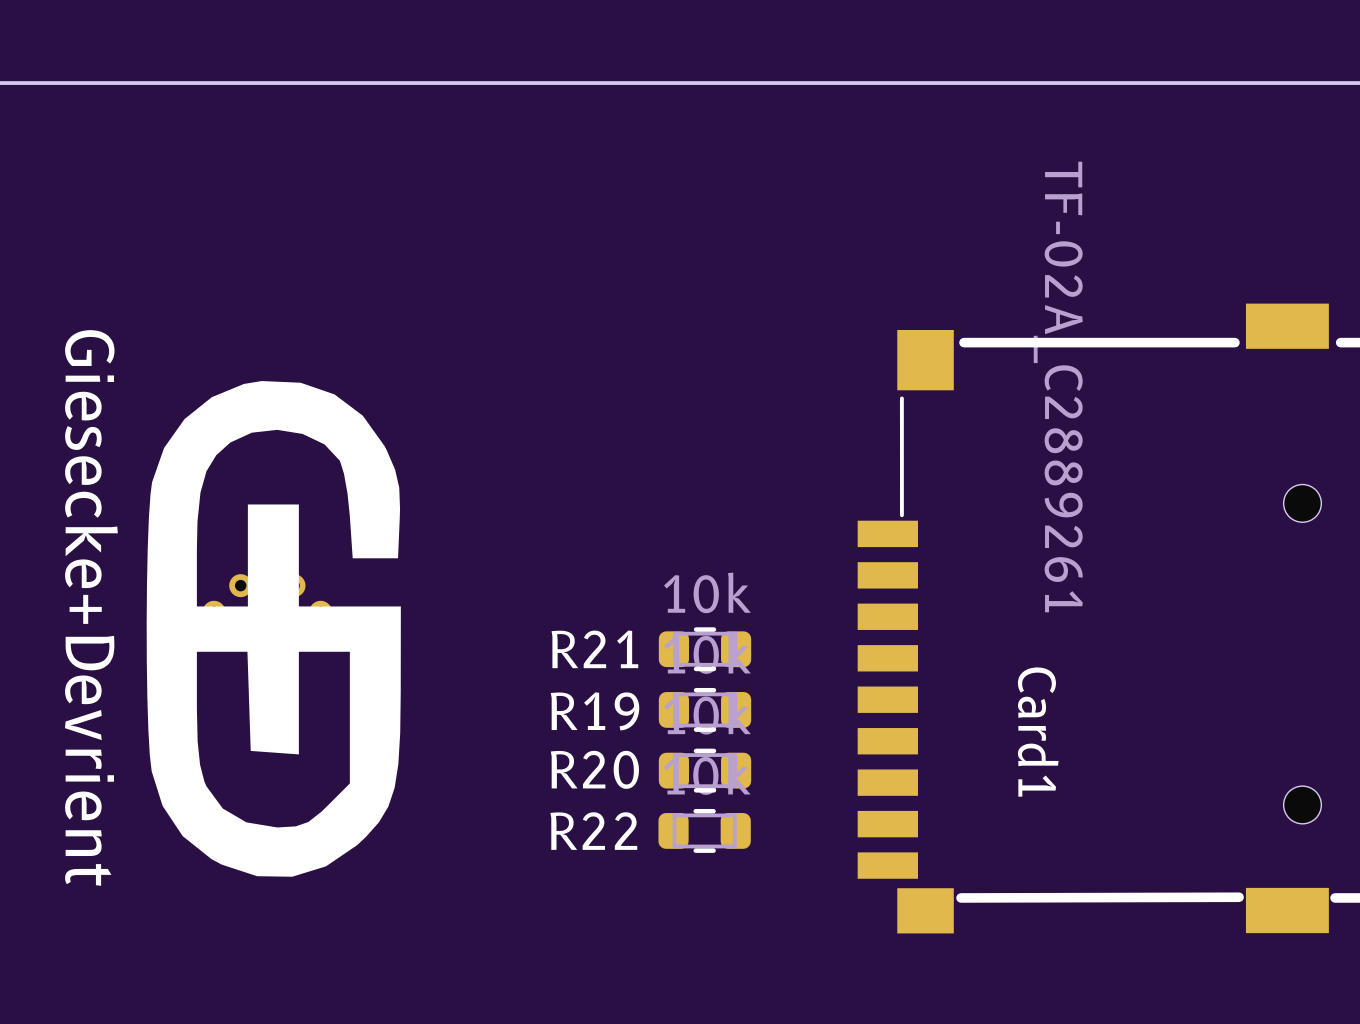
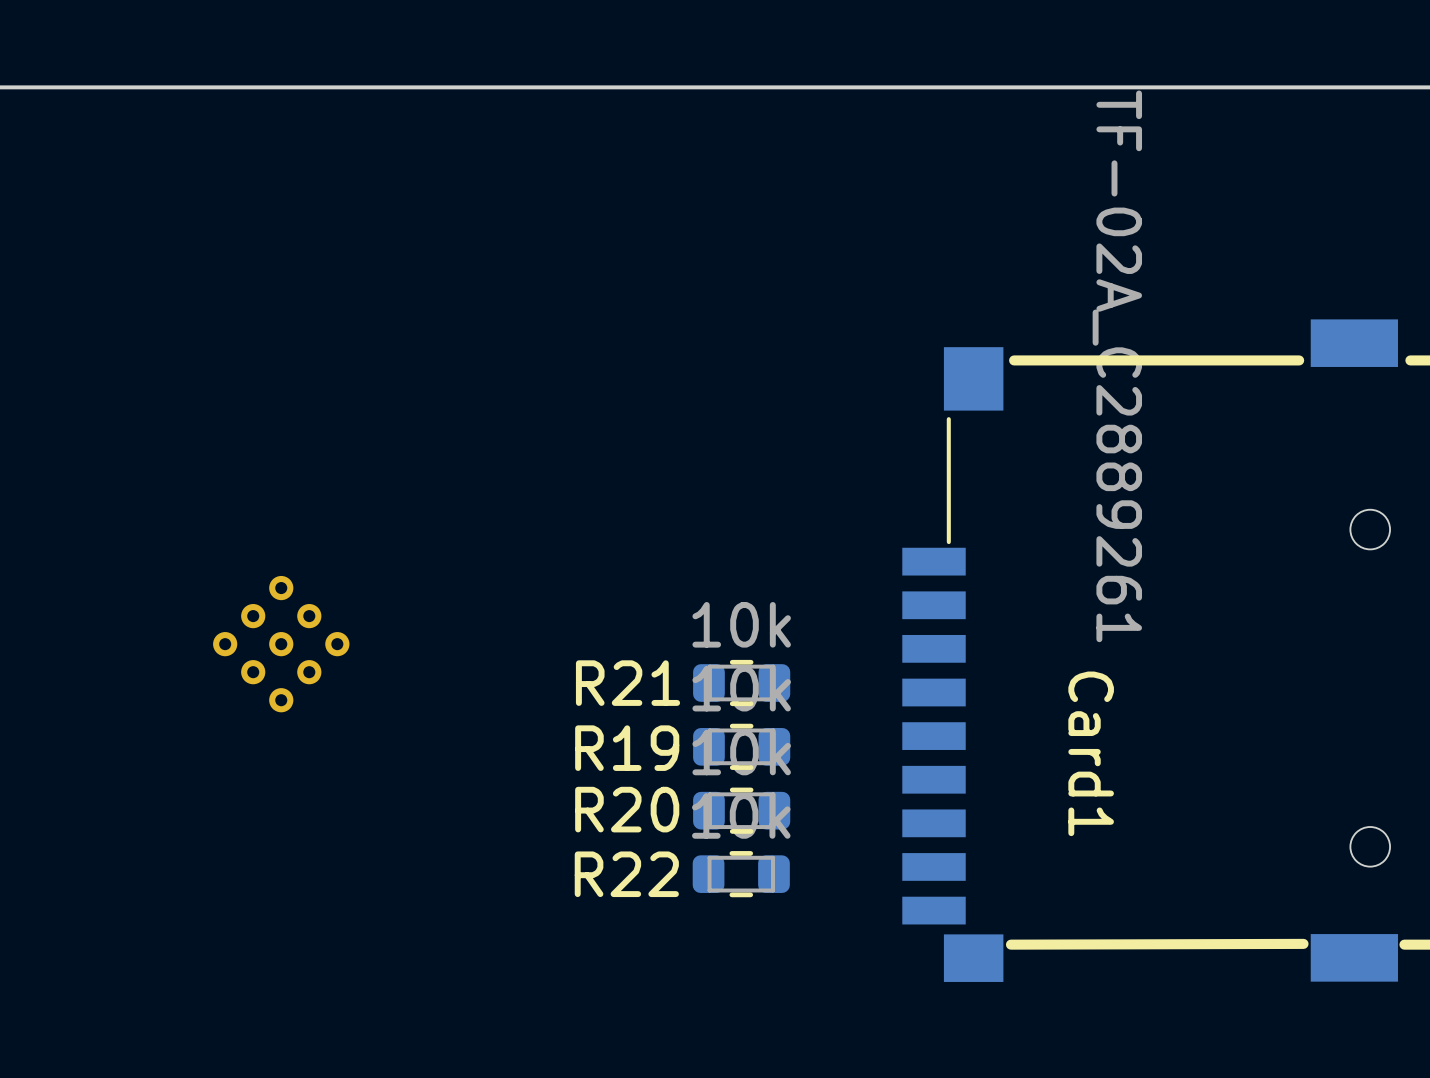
drawing: [146, 381, 401, 877] -> none
text: Giesecke+Devrient (91, 607) -> none

